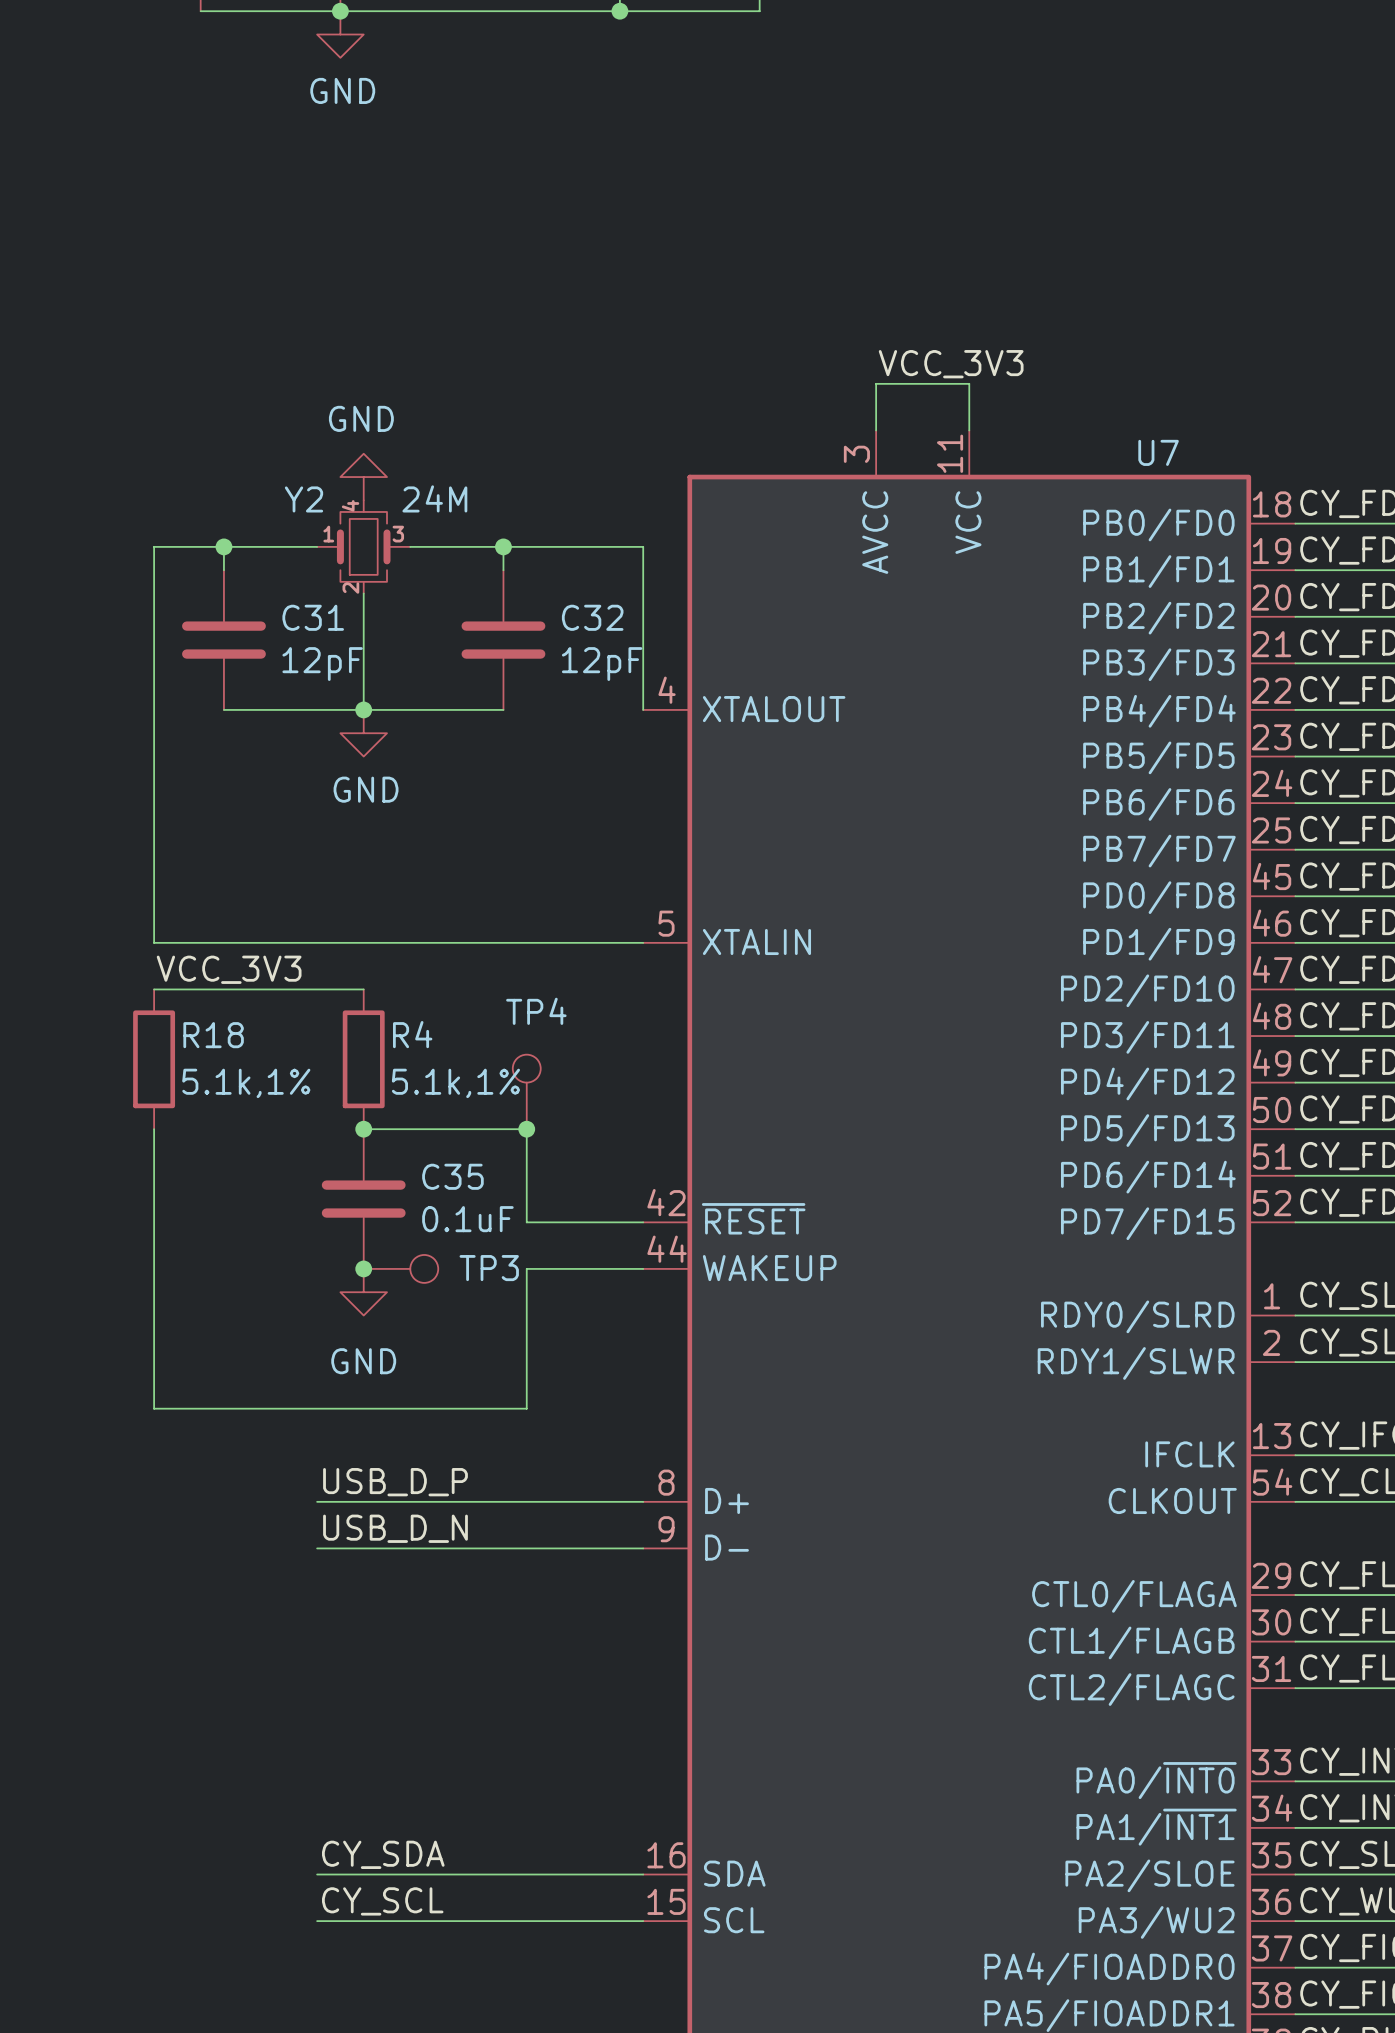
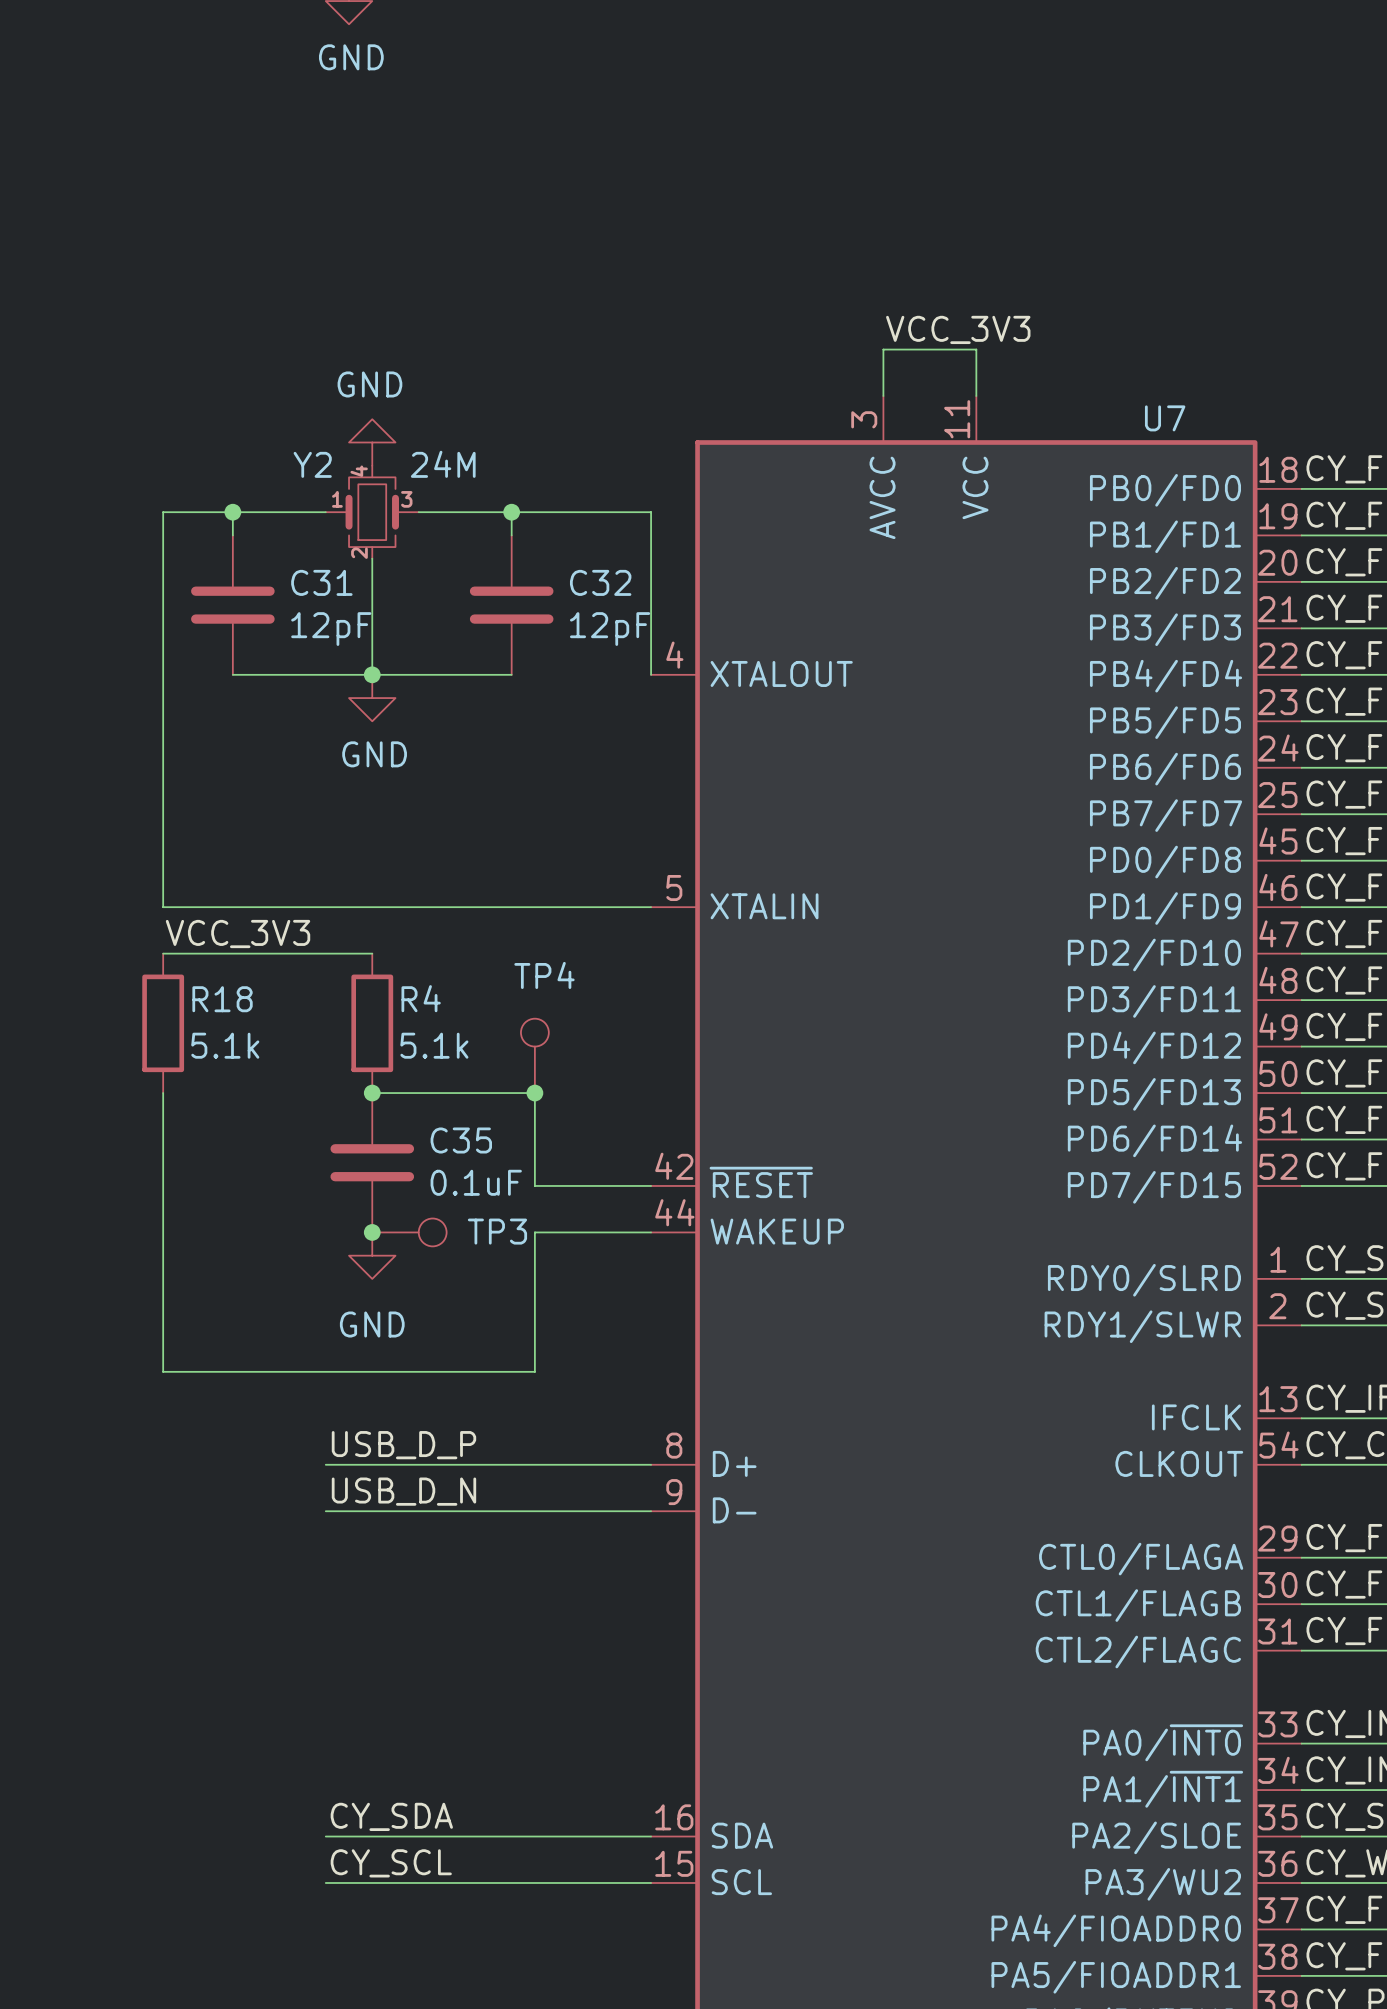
R18 value: 5.1k,1% (246, 1083) -> 5.1k (225, 1045)
R4 value: 5.1k,1% (455, 1083) -> 5.1k (434, 1045)

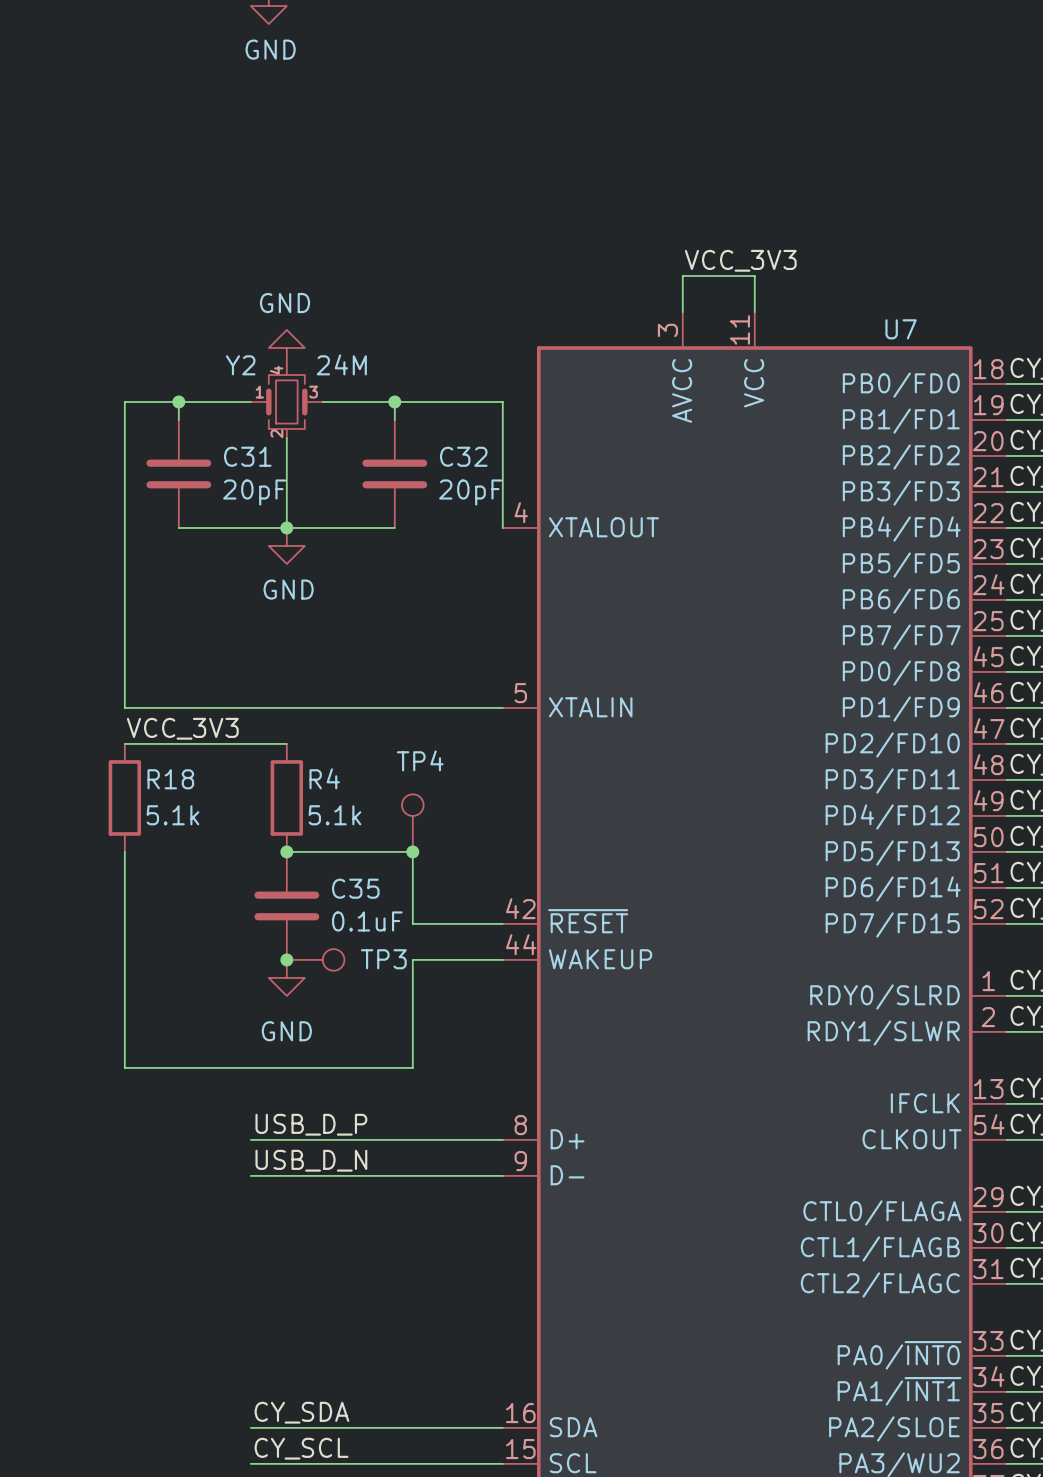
C31 value: 12pF (331, 629) -> 20pF (254, 492)
C32 value: 12pF (610, 629) -> 20pF (470, 492)

